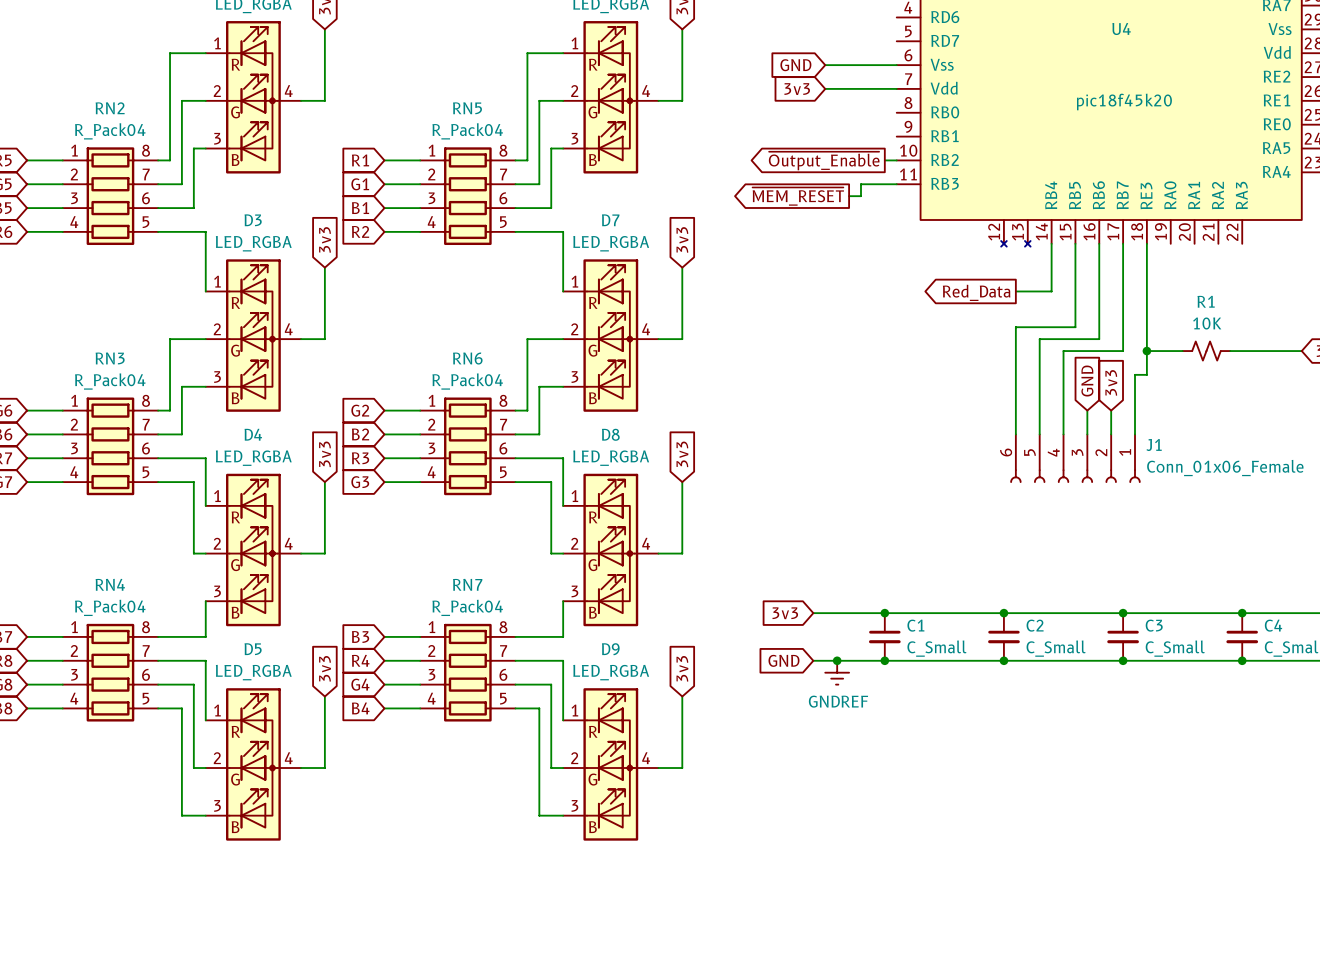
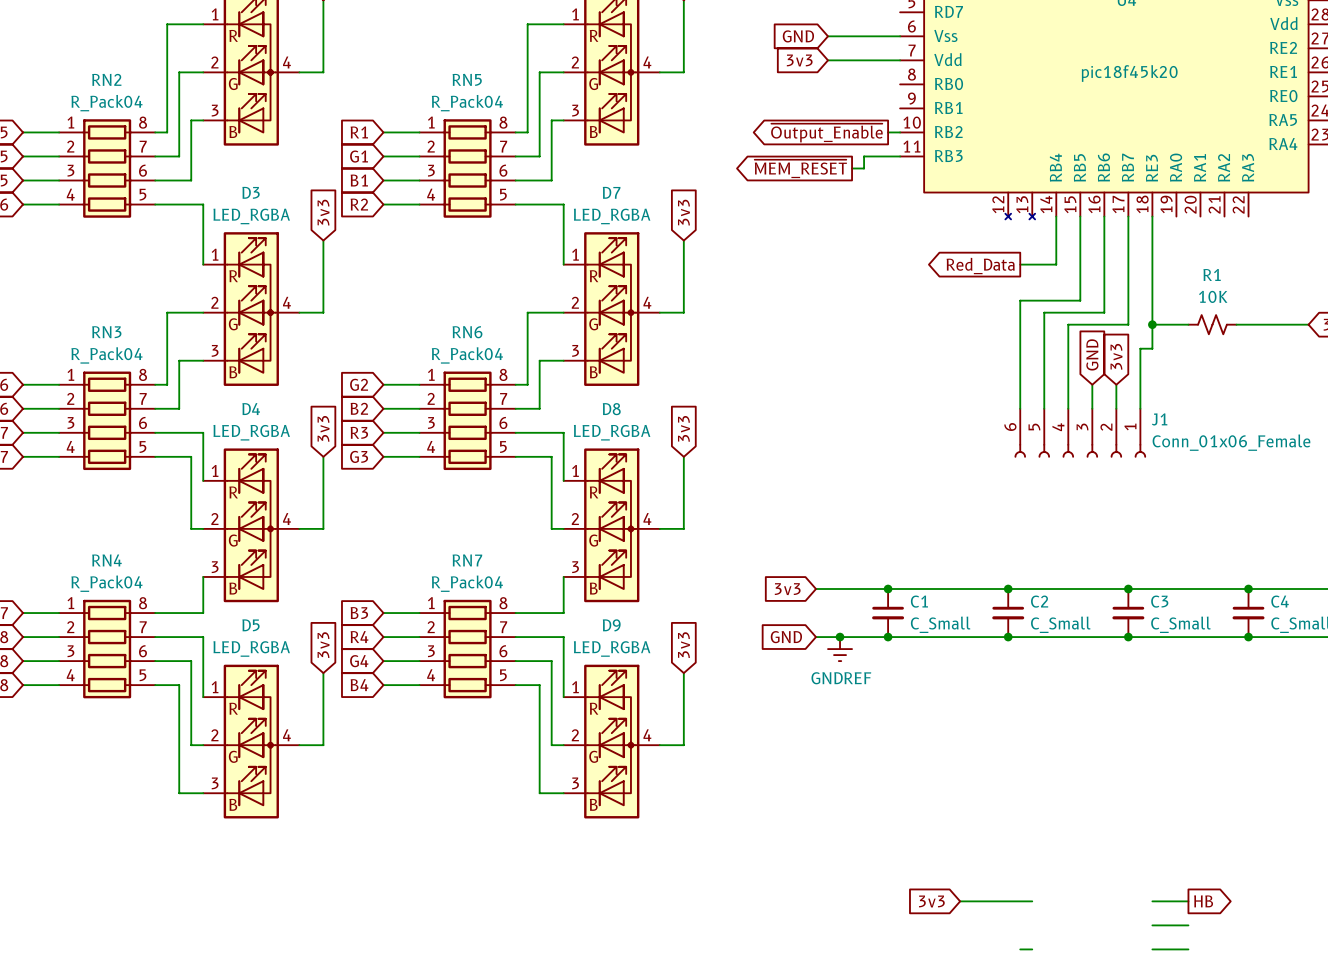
wire: none -> (960, 901) (1032, 901)
wire: none -> (1152, 901) (1188, 901)
global label: none -> HB (1203, 901)
global label: none -> 3v3 (931, 901)
wire: none -> (1152, 925) (1188, 925)
wire: none -> (1020, 949) (1032, 949)
wire: none -> (1152, 949) (1188, 949)

